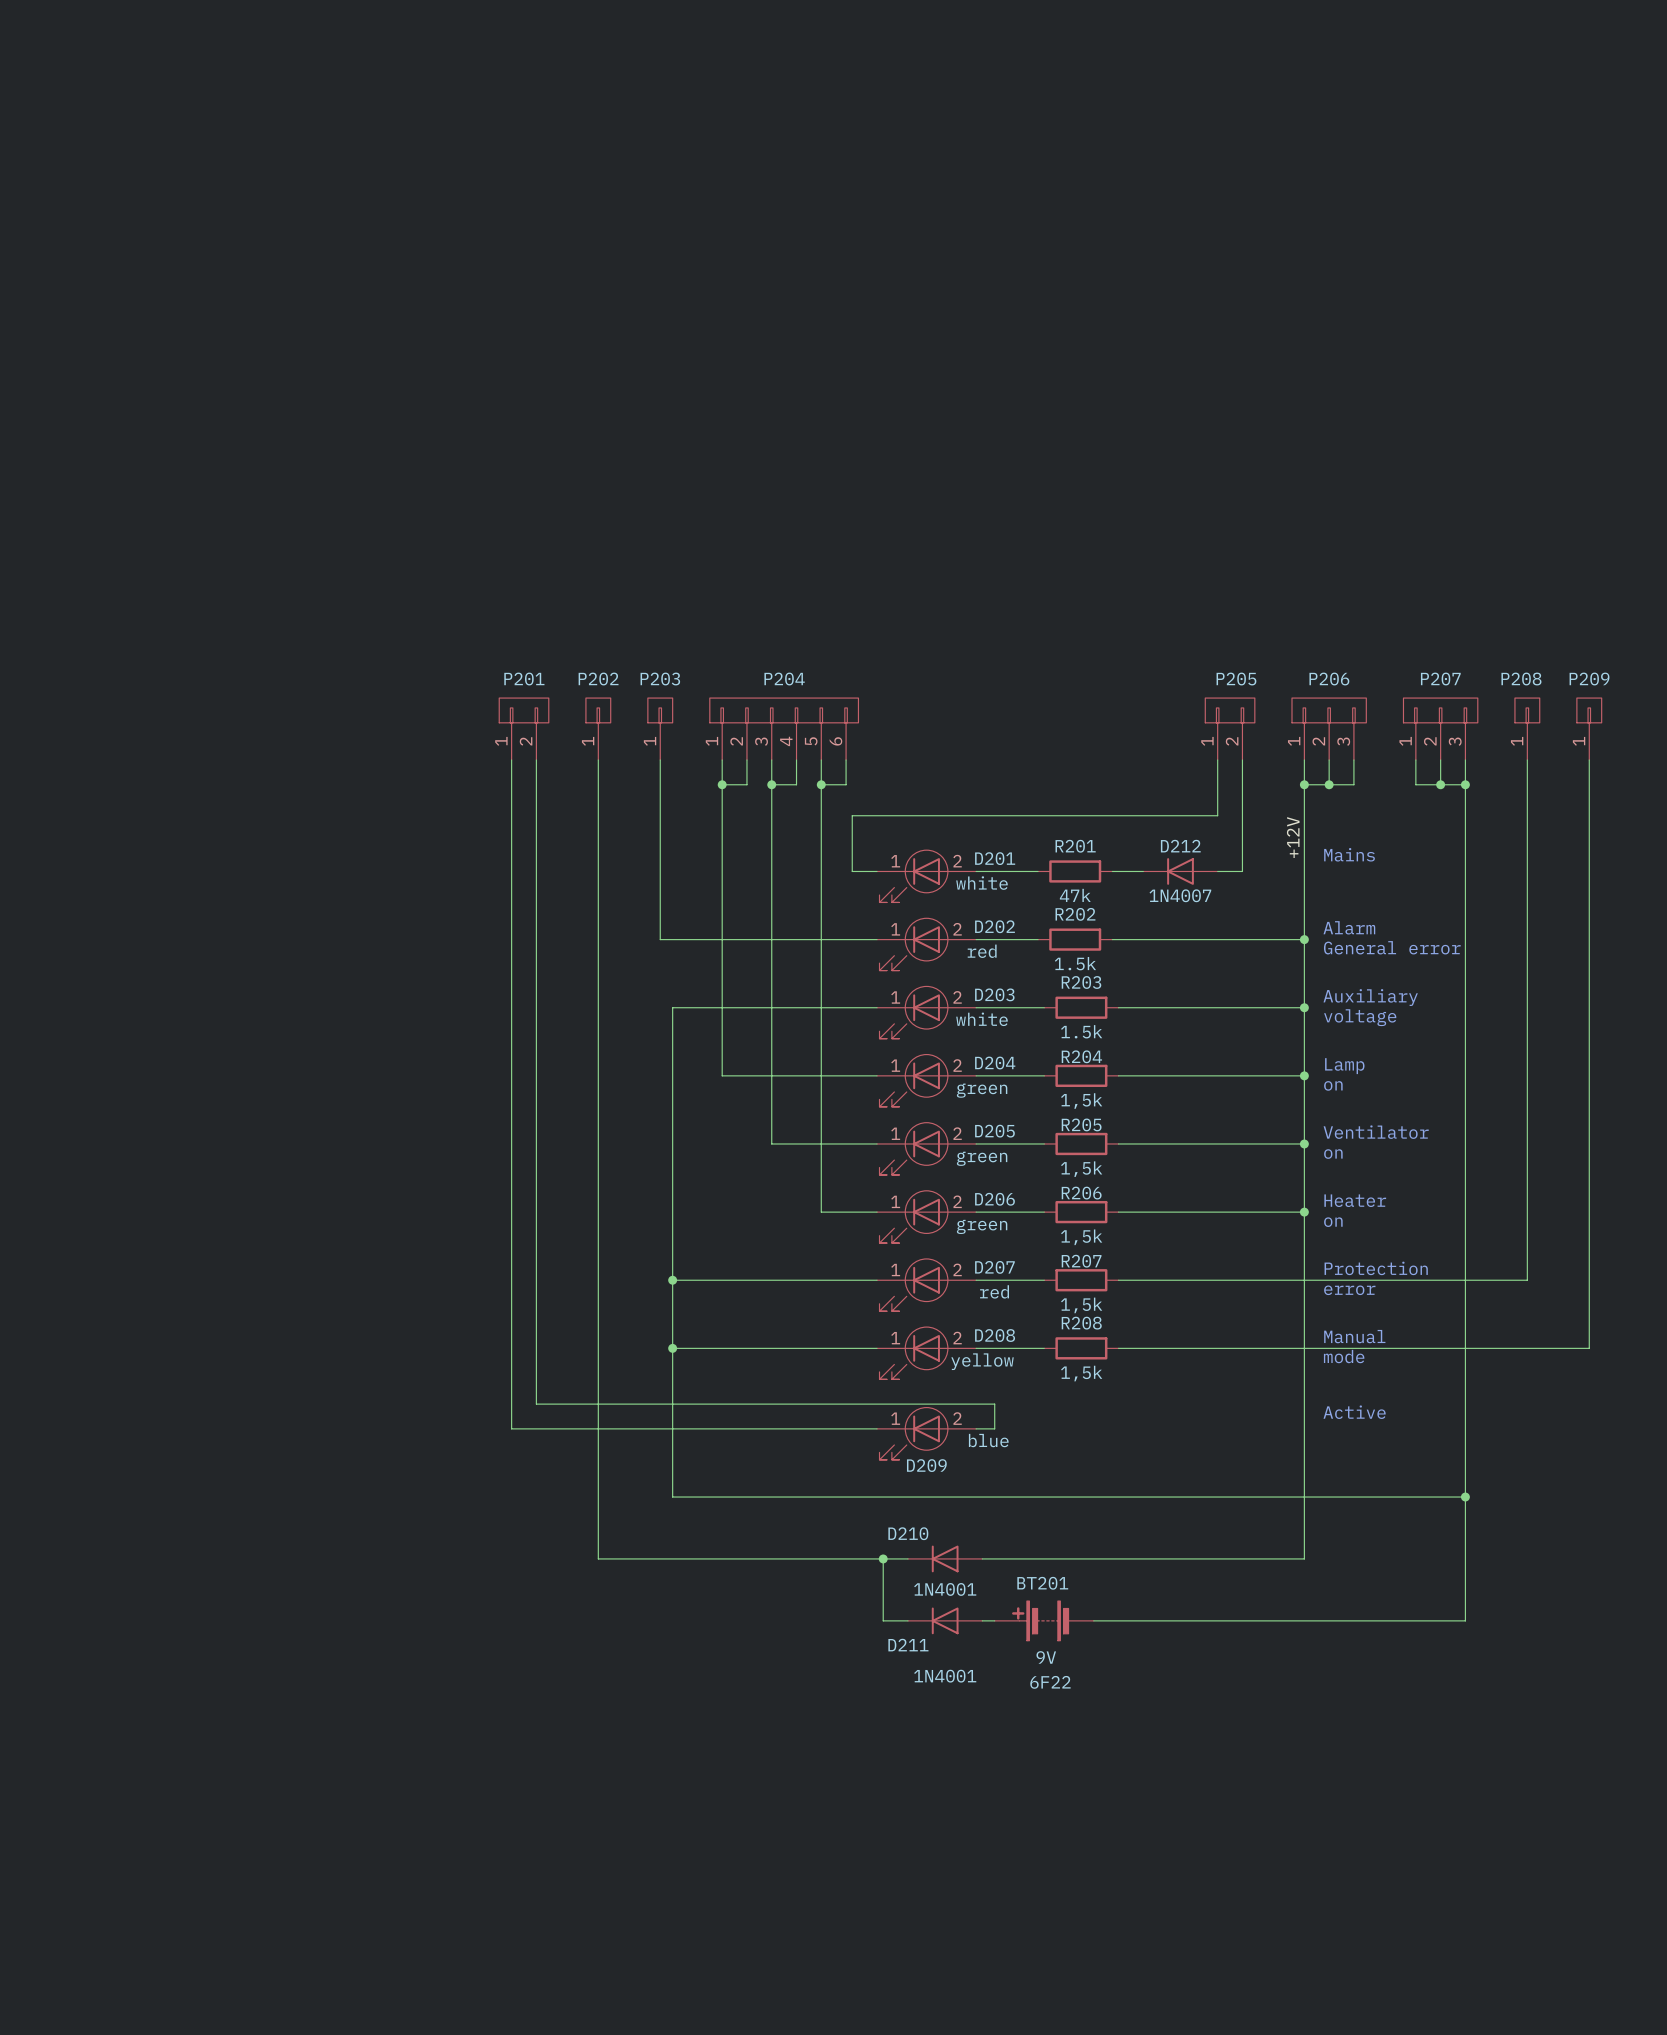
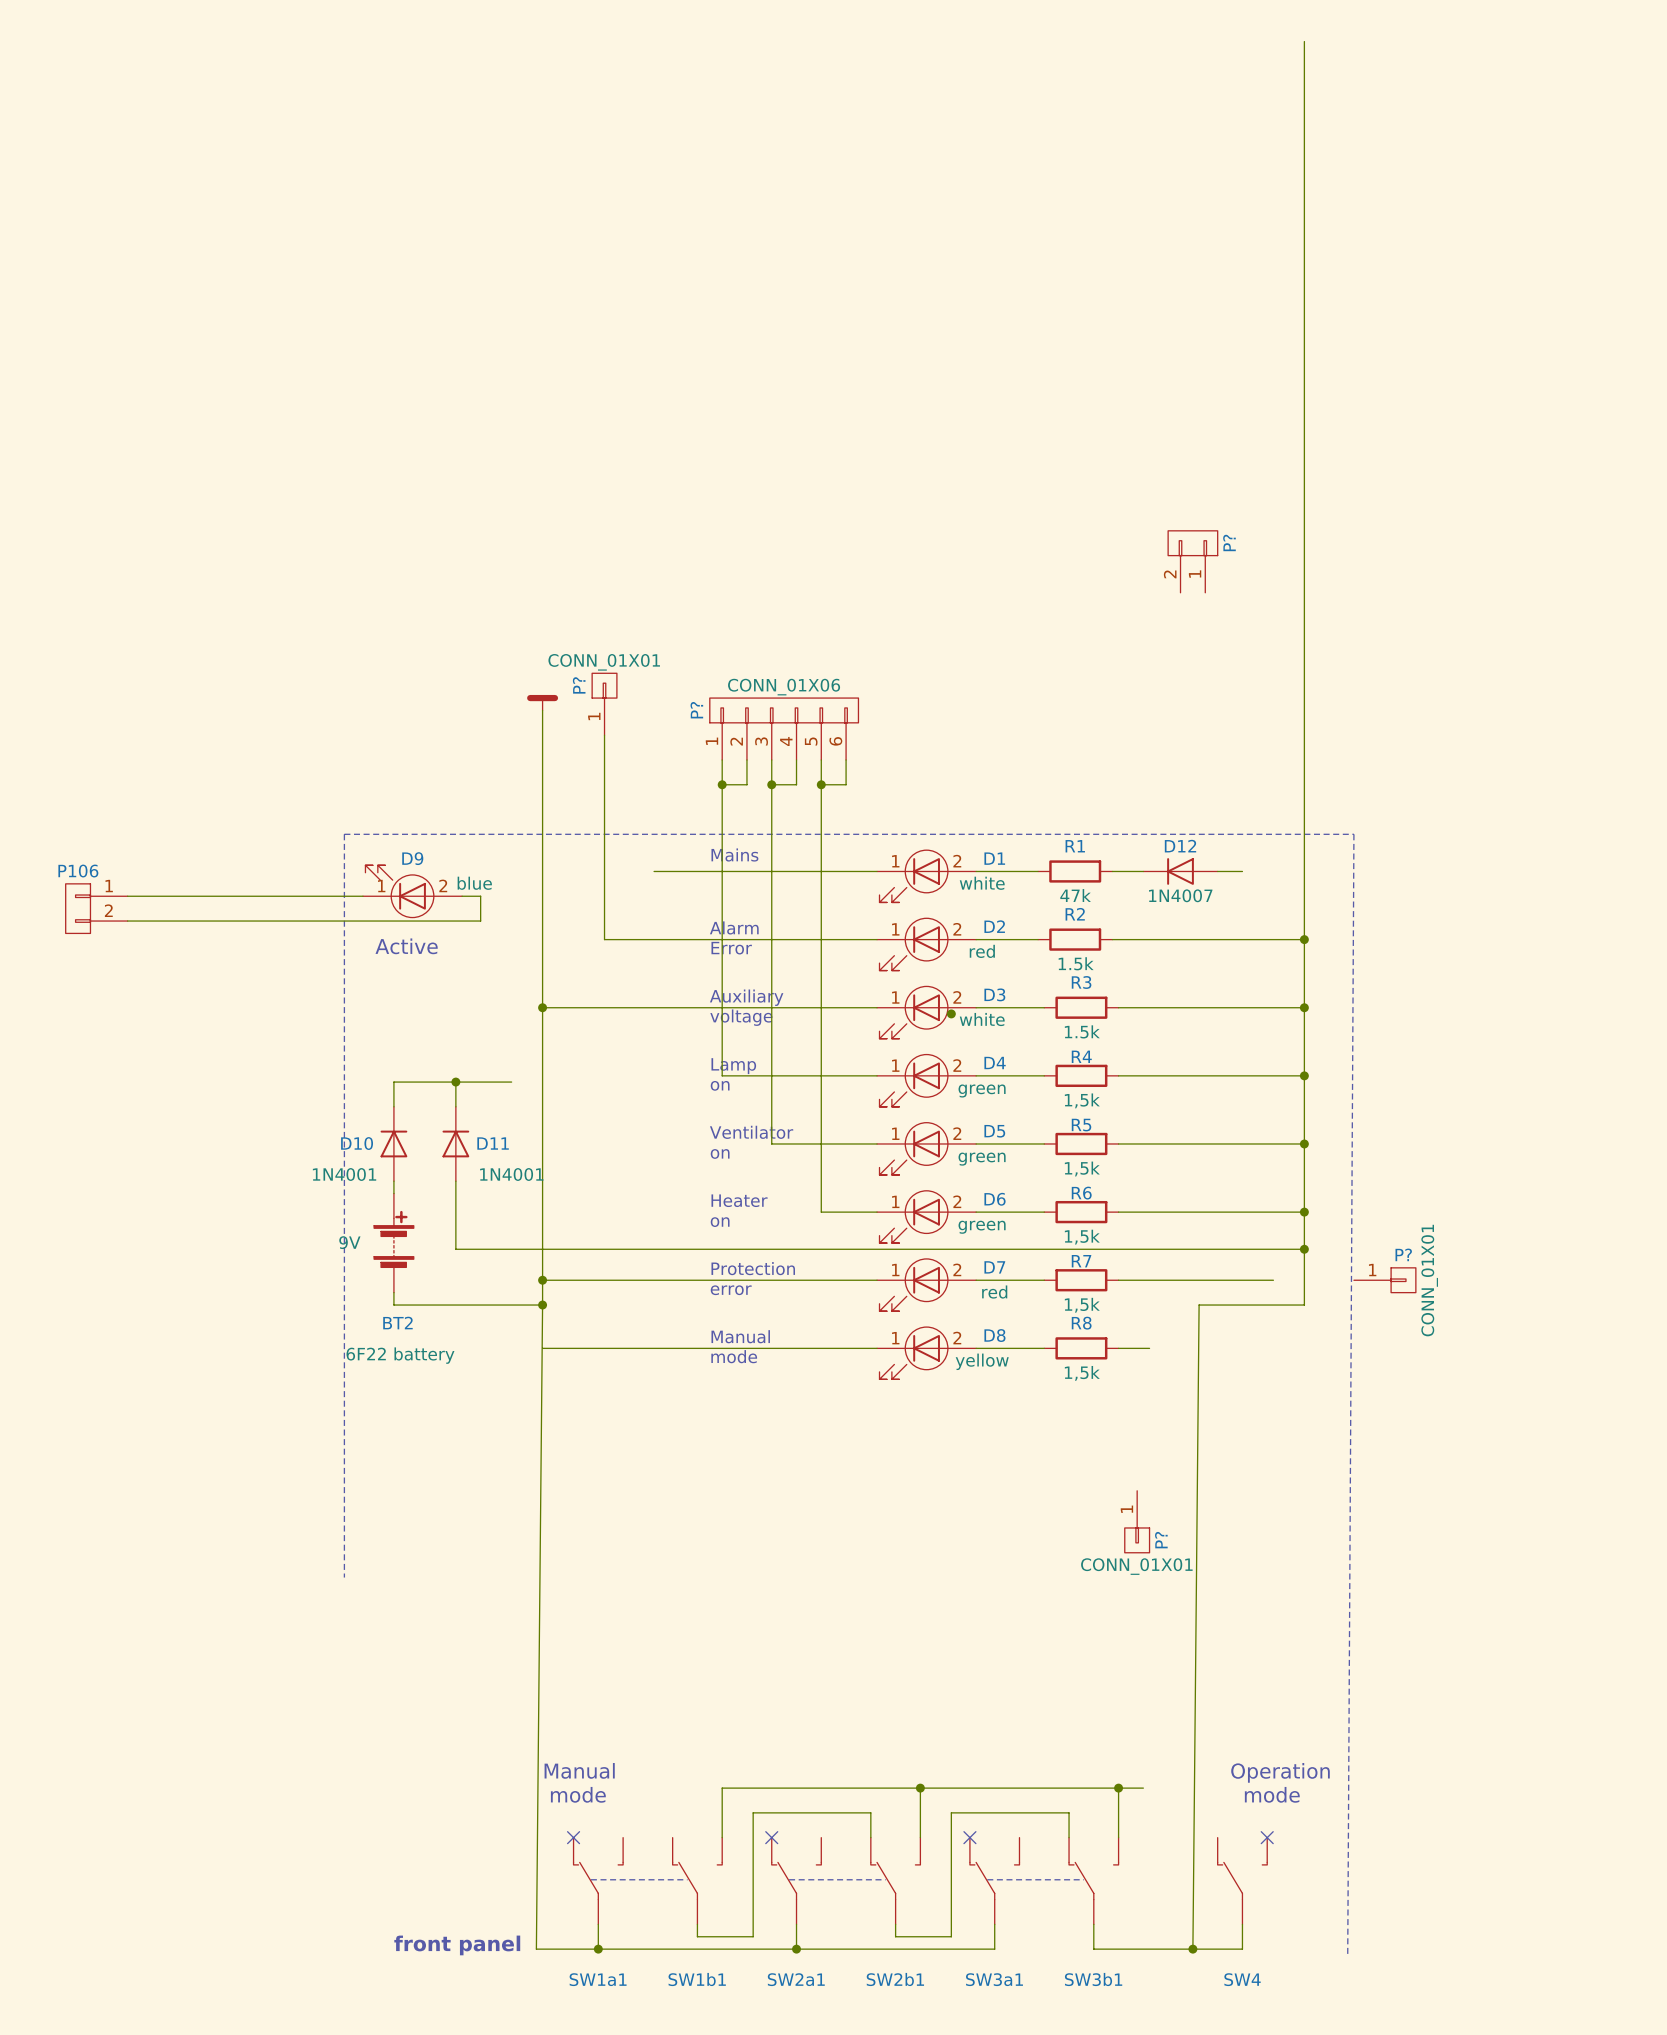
wire: none -> (1304, 41) (1304, 759)
P?: none -> (1192, 561)
P204 name: P204 (784, 679) -> P? (696, 710)
P204 value: none -> CONN_01X06 (784, 687)
power symbol: none -> (542, 702)
P?: none -> CONN_01X01 (604, 704)
wire: none -> (542, 710) (542, 1305)
P201: (524, 729) -> none
P202: (598, 729) -> none
P203: (660, 729) -> none
P205: (1230, 729) -> none
P206: (1329, 729) -> none
P207: (1440, 729) -> none
P208: (1527, 729) -> none
P209: (1589, 729) -> none
wire: (511, 759) (511, 1428) (877, 1428) -> none
wire: (536, 759) (536, 1404) (994, 1404) (994, 1428) (976, 1428) -> none
wire: (598, 759) (598, 1558) (908, 1558) -> none
wire: (660, 759) (660, 939) -> (604, 735) (604, 939) (660, 939)
wire: (1217, 759) (1217, 815) (852, 815) (852, 871) -> (654, 871) (852, 871)
wire: (1242, 759) (1242, 871) -> none
wire: (1329, 759) (1329, 784) -> none
wire: (1353, 759) (1353, 784) (1304, 784) -> none
wire: (1415, 759) (1415, 784) (1465, 784) -> none
wire: (1440, 759) (1440, 784) -> none
wire: (1465, 759) (1465, 1620) (1093, 1620) -> none
wire: (1527, 759) (1527, 1280) (1273, 1280) -> none
wire: (1589, 759) (1589, 1348) (1149, 1348) -> none
junction: (1304, 784) -> none
junction: (1329, 784) -> none
junction: (1440, 784) -> none
junction: (1465, 784) -> none
label: +12V (1293, 837) -> none
R201 name: R201 (1075, 846) -> R1 (1075, 846)
D212 name: D212 (1180, 846) -> D12 (1180, 846)
text: none -> Mains (734, 854)
text: Mains (1349, 854) -> none
D201 name: D201 (995, 858) -> D1 (994, 858)
D9: none -> blue (412, 891)
wire: none -> (127, 896) (362, 896)
wire: none -> (462, 896) (480, 896) (480, 921) (127, 921)
P106: none -> (96, 908)
R202 name: R202 (1075, 914) -> R2 (1075, 914)
D202 name: D202 (994, 926) -> D2 (994, 926)
text: none -> Alarm (734, 927)
text: Alarm (1349, 927) -> none
text: none -> Active (406, 946)
text: General error (1392, 947) -> none
text: none -> Error (731, 948)
R203 name: R203 (1081, 982) -> R3 (1081, 982)
D203 name: D203 (994, 994) -> D3 (994, 994)
text: none -> Auxiliary (746, 997)
text: Auxiliary (1370, 997) -> none
junction: none -> (542, 1007)
wire: (672, 1007) (672, 1497) (1465, 1497) -> (672, 1007) (542, 1007)
junction: none -> (951, 1013)
text: none -> voltage (741, 1017)
text: voltage (1360, 1017) -> none
R204 name: R204 (1081, 1056) -> R4 (1081, 1056)
D204 name: D204 (995, 1063) -> D4 (995, 1063)
text: none -> Lamp (733, 1066)
text: Lamp (1344, 1066) -> none
wire: none -> (455, 1082) (455, 1106)
junction: none -> (455, 1082)
wire: none -> (511, 1082) (393, 1082) (393, 1106)
text: none -> on (720, 1085)
text: on (1333, 1085) -> none
R205 name: R205 (1081, 1124) -> R5 (1081, 1125)
D205 name: D205 (994, 1131) -> D5 (994, 1131)
text: none -> Ventilator (751, 1132)
text: Ventilator (1376, 1132) -> none
D10: none -> 1N4001 (393, 1143)
D11: none -> 1N4001 (455, 1143)
text: none -> on (720, 1153)
text: on (1333, 1154) -> none
wire: none -> (393, 1181) (393, 1193)
wire: none -> (455, 1181) (455, 1249) (1304, 1249)
R206 name: R206 (1081, 1193) -> R6 (1081, 1193)
D206 name: D206 (994, 1199) -> D6 (995, 1199)
text: none -> Heater (739, 1200)
text: Heater (1355, 1200) -> none
text: none -> on (720, 1222)
text: on (1333, 1222) -> none
BT2: none -> 9V (393, 1243)
junction: none -> (1304, 1249)
R207 name: R207 (1081, 1261) -> R7 (1081, 1261)
D207 name: D207 (994, 1267) -> D7 (994, 1267)
text: none -> Protection (753, 1268)
text: Protection (1376, 1268) -> none
wire: none -> (542, 1280) (672, 1280)
junction: none -> (542, 1280)
junction: (672, 1280) -> none
P?: none -> CONN_01X01 (1384, 1280)
text: none -> error (731, 1290)
text: error (1349, 1290) -> none
wire: none -> (393, 1292) (393, 1305) (542, 1305)
wire: none -> (542, 1305) (536, 1949) (994, 1949) (994, 1924)
junction: none -> (542, 1305)
wire: (1304, 1305) (1304, 1558) (982, 1558) -> (1304, 1305) (1199, 1305) (1192, 1949)
R208 name: R208 (1081, 1323) -> R8 (1081, 1323)
D208 name: D208 (995, 1335) -> D8 (994, 1335)
text: none -> Manual (740, 1336)
text: Manual (1354, 1336) -> none
wire: none -> (542, 1348) (672, 1348)
junction: (672, 1348) -> none
text: none -> mode (734, 1356)
text: mode (1344, 1356) -> none
text: Active (1354, 1412) -> none
D209: blue (926, 1433) -> none
junction: (1465, 1497) -> none
P?: none -> CONN_01X01 (1137, 1521)
wire: (883, 1558) (883, 1620) (908, 1620) -> none
junction: (883, 1558) -> none
D210: 1N4001 (945, 1558) -> none
line: none -> (344, 1577) (344, 834) (1353, 834) (1347, 1955)
D211: 1N4001 (945, 1620) -> none
wire: (982, 1620) (994, 1620) -> none
BT201: 9V (1044, 1620) -> none
text: none -> Manual (579, 1770)
text: none -> Operation (1280, 1772)
wire: none -> (920, 1788) (920, 1837)
junction: none -> (920, 1788)
wire: none -> (1118, 1788) (1118, 1837)
junction: none -> (1118, 1788)
wire: none -> (1143, 1788) (722, 1788) (722, 1837)
text: none -> mode (578, 1794)
text: none -> mode (1272, 1794)
no-connect mark: none -> (573, 1837)
no-connect mark: none -> (771, 1837)
wire: none -> (870, 1837) (870, 1812) (753, 1812) (753, 1936) (697, 1936) (697, 1924)
no-connect mark: none -> (969, 1837)
wire: none -> (1069, 1837) (1069, 1812) (951, 1812) (951, 1936) (895, 1936) (895, 1924)
no-connect mark: none -> (1267, 1837)
line: none -> (590, 1879) (687, 1879)
line: none -> (789, 1879) (885, 1879)
line: none -> (987, 1879) (1083, 1879)
SW1a1: none -> (598, 1881)
SW1b1: none -> (697, 1881)
SW2a1: none -> (796, 1881)
SW2b1: none -> (895, 1881)
SW3a1: none -> (994, 1881)
SW3b1: none -> (1093, 1881)
SW4: none -> (1242, 1881)
wire: none -> (598, 1924) (598, 1949)
wire: none -> (796, 1924) (796, 1949)
wire: none -> (1093, 1924) (1093, 1949) (1242, 1949) (1242, 1924)
text: none -> front panel (457, 1945)
junction: none -> (598, 1949)
junction: none -> (796, 1949)
junction: none -> (1192, 1949)

